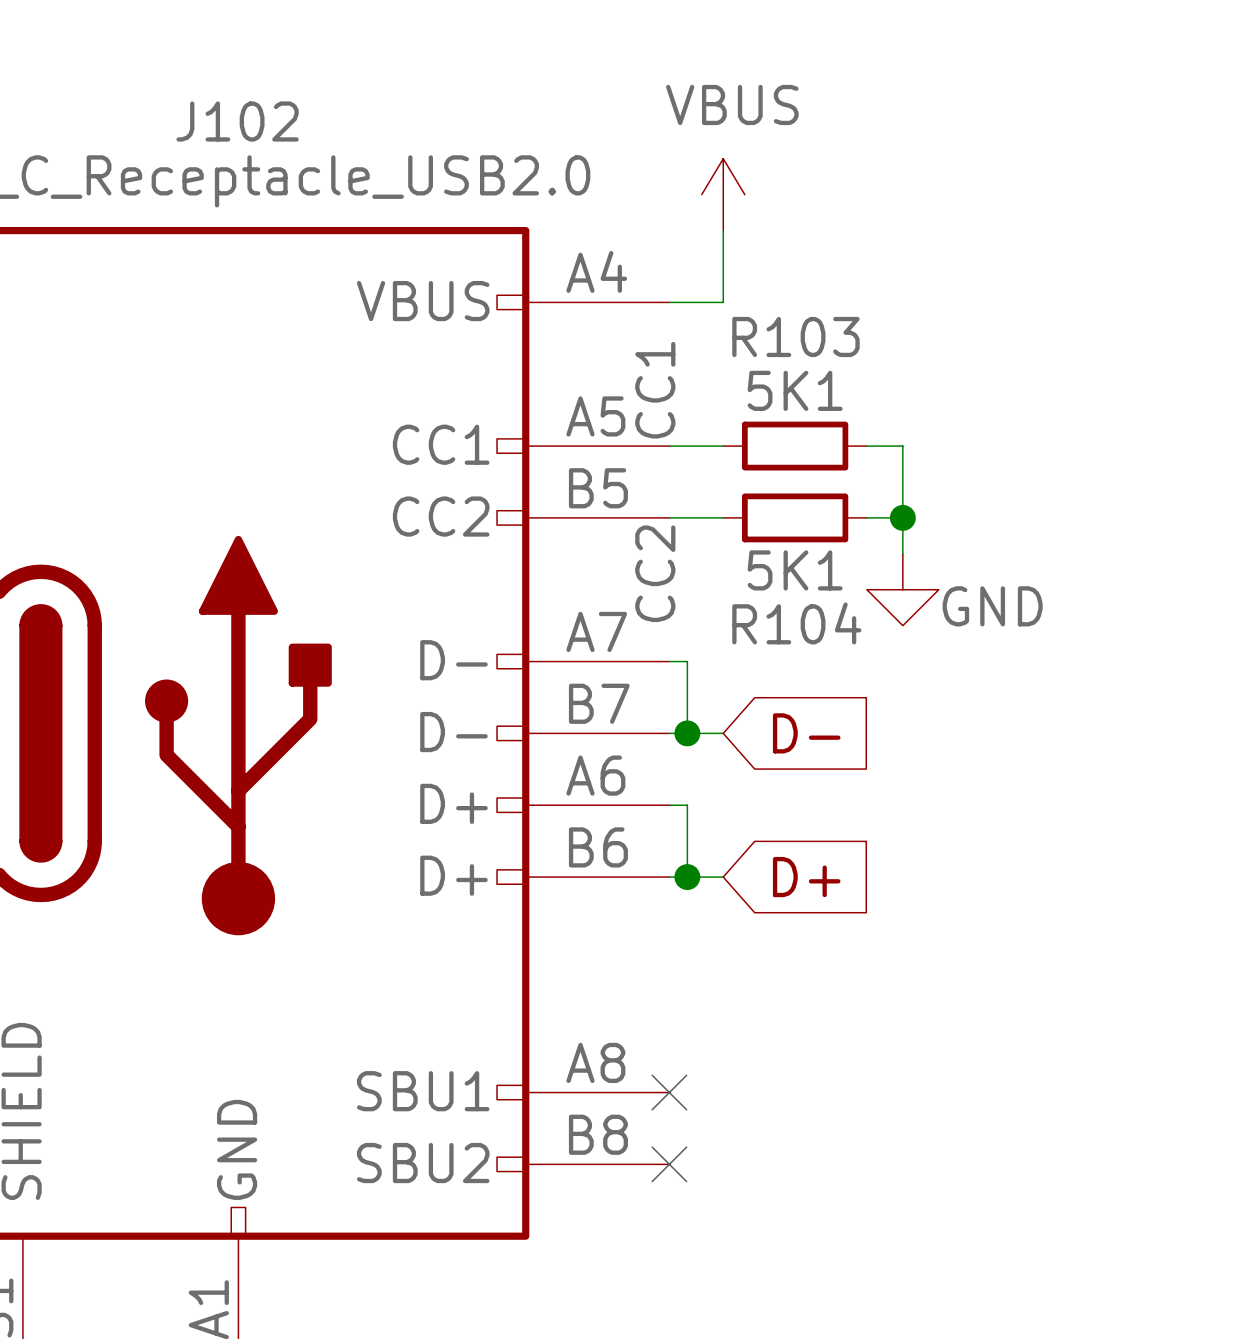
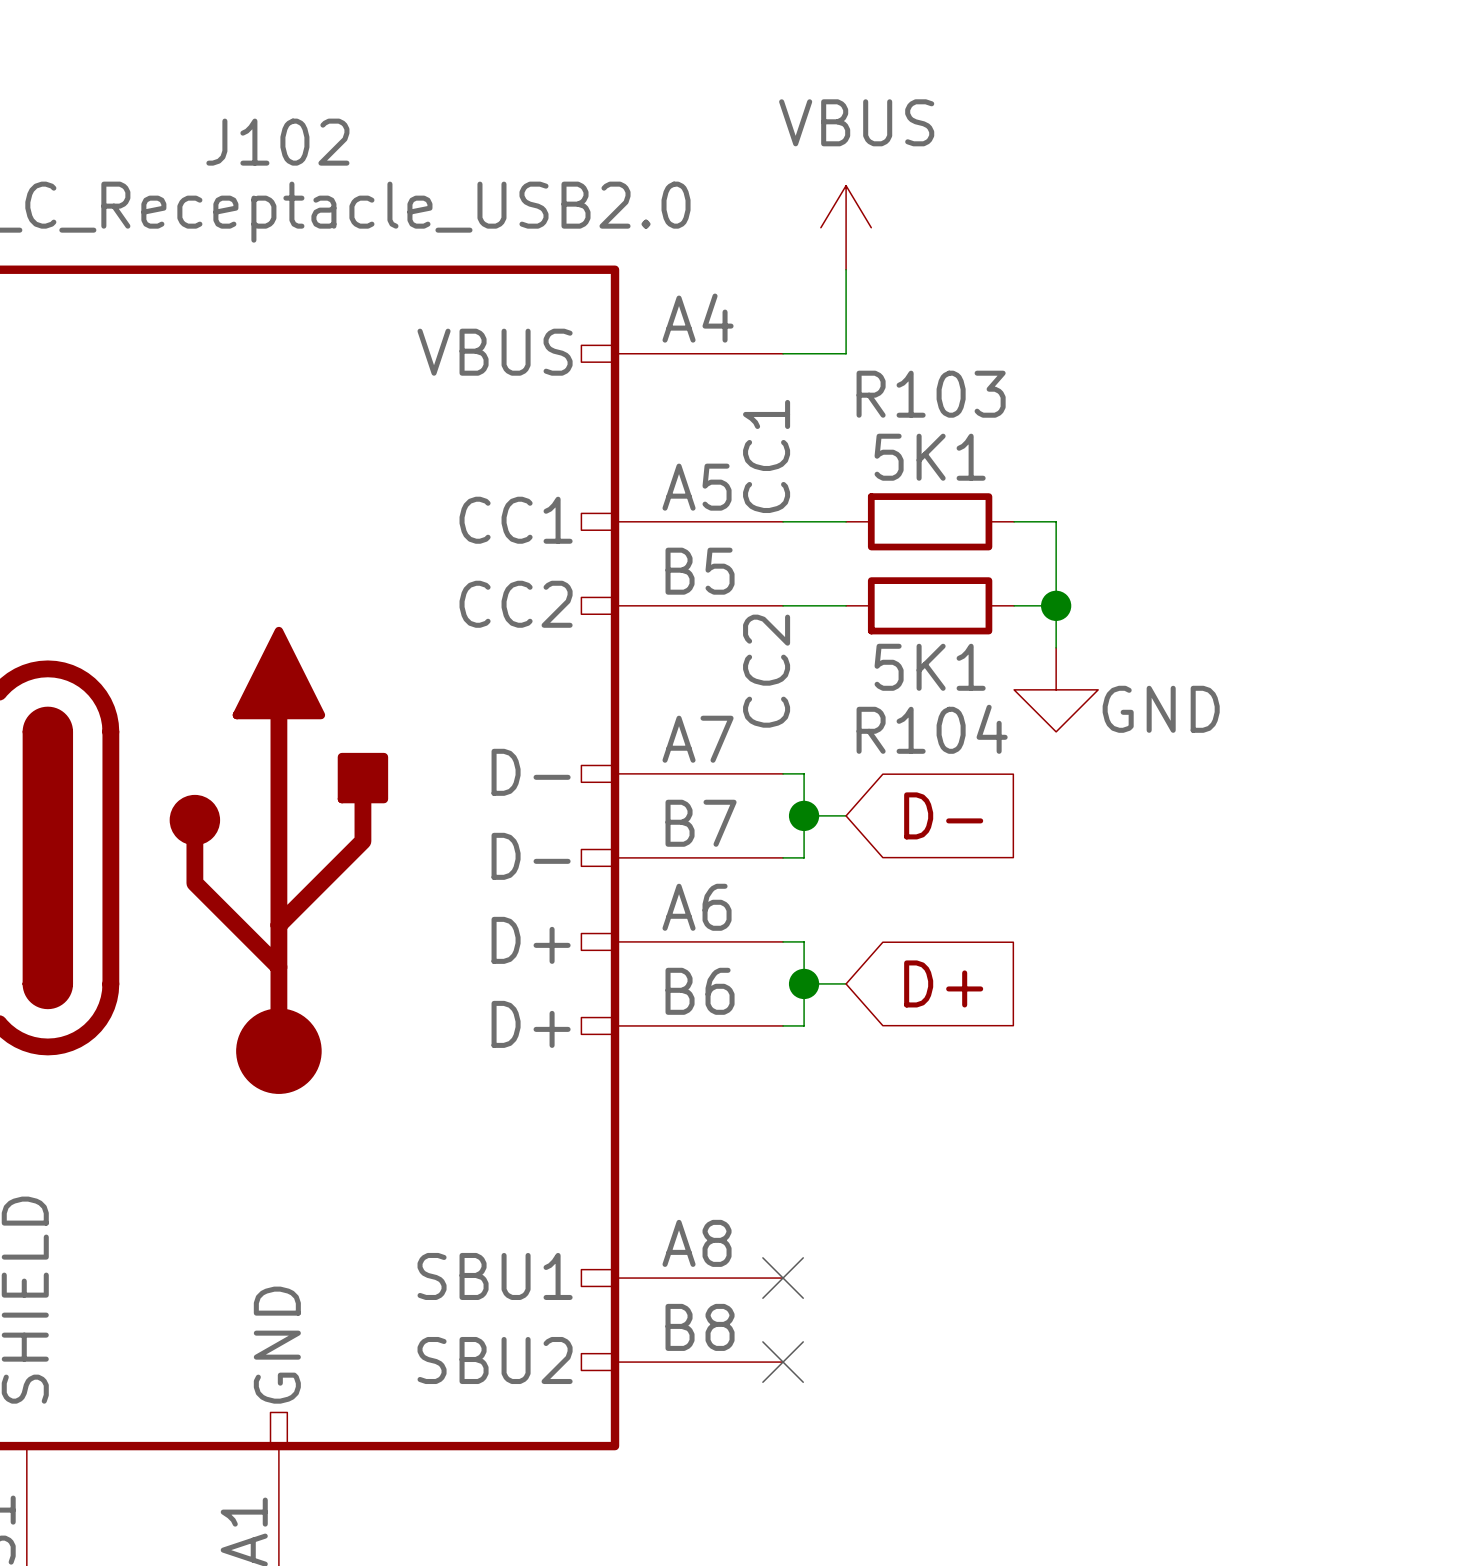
wire: (687, 733) (723, 733) -> (804, 815) (846, 815)
junction position: (687, 733) -> (804, 815)
global label position: D- (806, 733) -> D- (943, 815)
wire: (687, 877) (723, 877) -> (804, 983) (846, 983)
junction position: (687, 877) -> (804, 983)
global label position: D+ (806, 877) -> D+ (943, 983)

